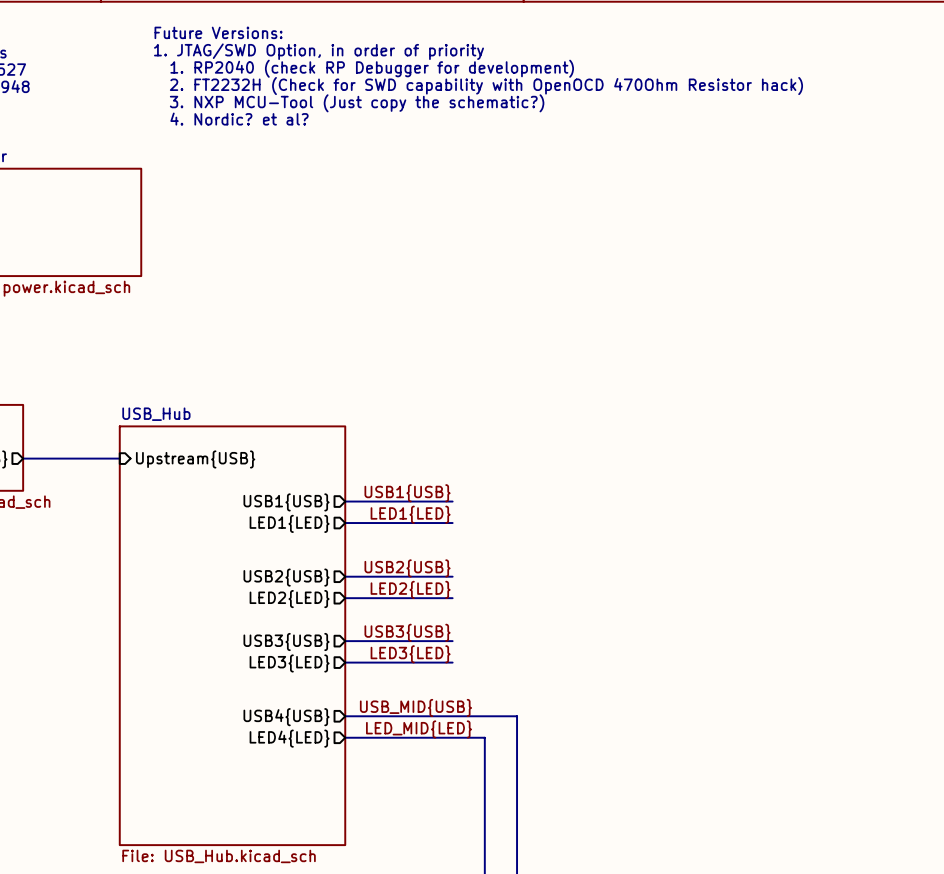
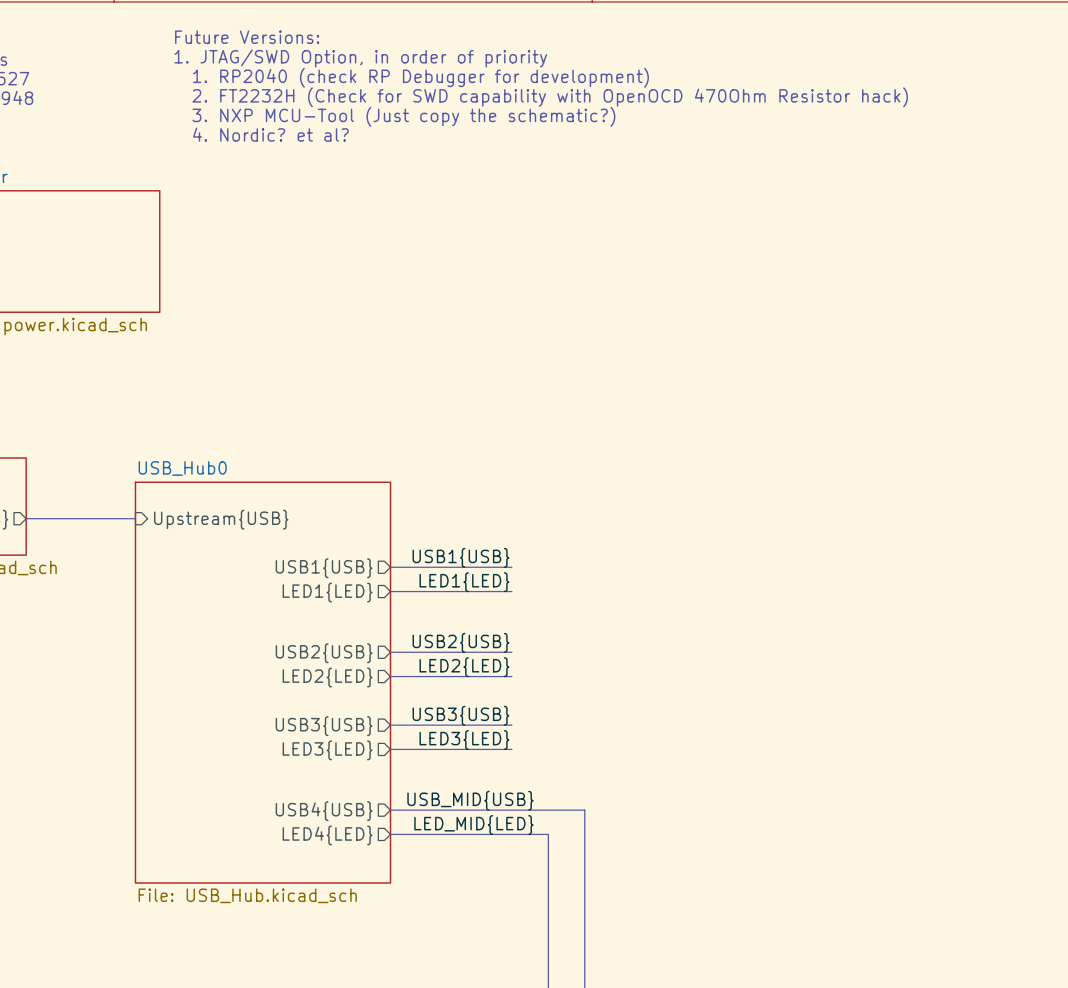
sheet USB_Hub0: none -> File: USB_Hub.kicad_sch (262, 682)
sheet USB_Hub: File: USB_Hub.kicad_sch (232, 635) -> none

